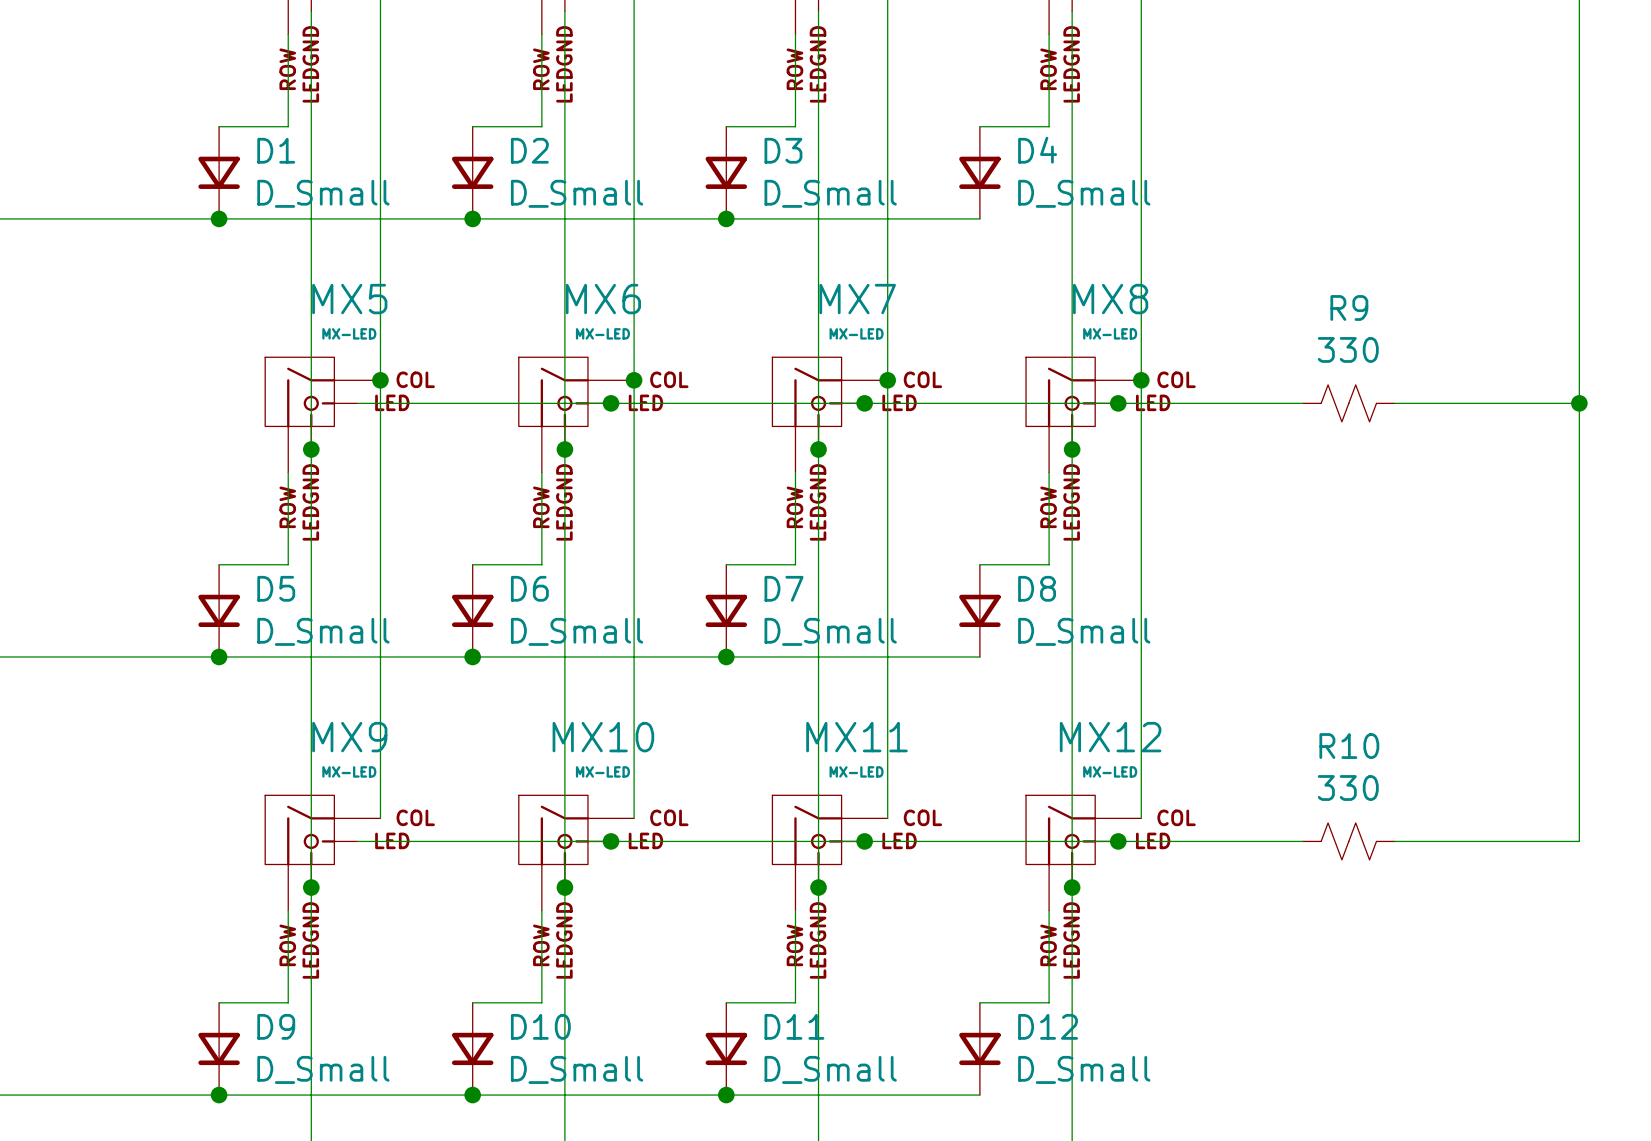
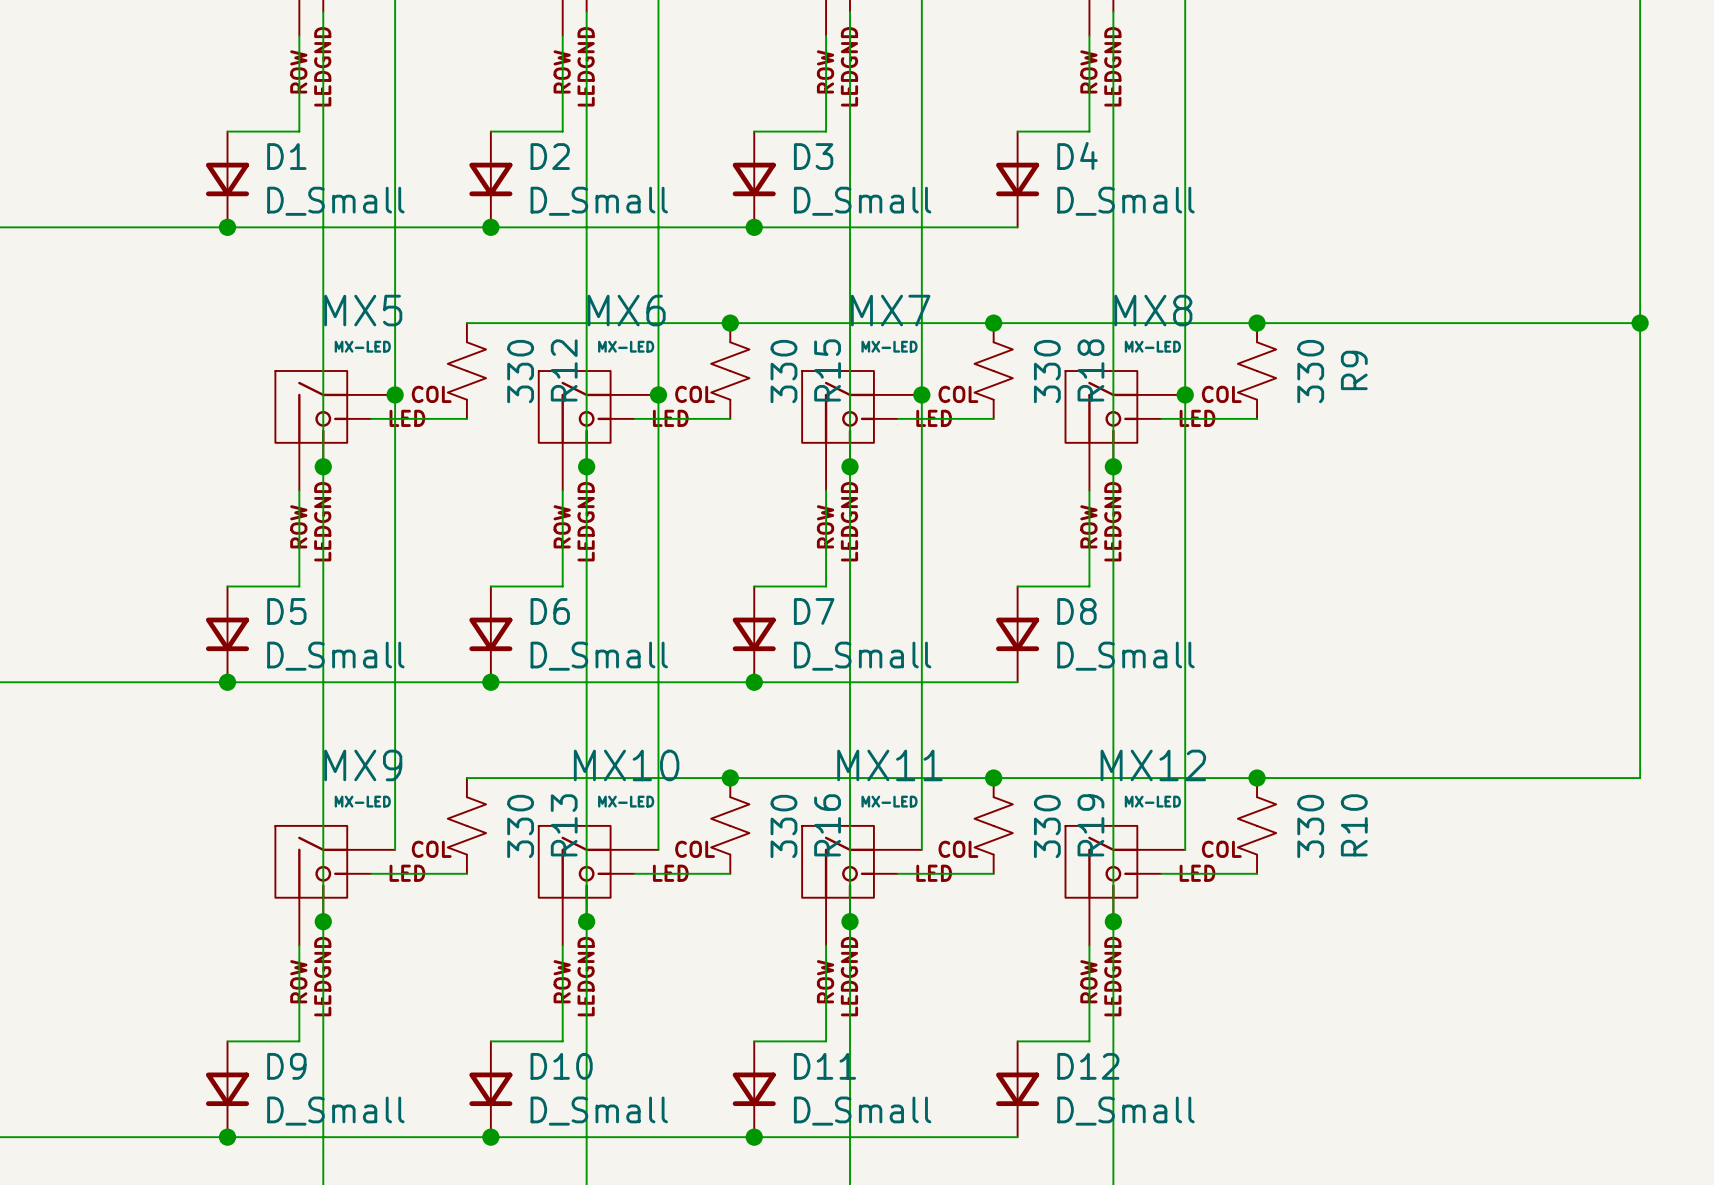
wire: none -> (466, 323) (1640, 323)
junction: none -> (730, 323)
junction: none -> (993, 323)
junction: none -> (1257, 323)
R12: none -> 330 (466, 371)
R15: none -> 330 (730, 371)
R18: none -> 330 (993, 371)
wire: (449, 403) (611, 403) -> none
junction: (611, 403) -> none
wire: (703, 403) (864, 403) -> none
junction: (864, 403) -> none
wire: (956, 403) (1118, 403) -> none
junction: (1118, 403) -> none
wire: (1210, 403) (1302, 403) -> none
R9 rotation: 0° (1348, 403) -> 90° clockwise (1257, 371)
R9 position: (1348, 403) -> (1257, 371)
wire: (1394, 403) (1579, 403) -> none
junction position: (1579, 403) -> (1640, 323)
junction: none -> (730, 778)
junction: none -> (993, 778)
junction: none -> (1257, 778)
wire: (1579, 749) (1579, 841) (1394, 841) -> (1640, 778) (466, 778)
R13: none -> 330 (466, 825)
R16: none -> 330 (730, 825)
R19: none -> 330 (993, 825)
wire: (449, 841) (611, 841) -> none
junction: (611, 841) -> none
wire: (703, 841) (864, 841) -> none
junction: (864, 841) -> none
wire: (956, 841) (1118, 841) -> none
junction: (1118, 841) -> none
wire: (1210, 841) (1302, 841) -> none
R10 rotation: 0° (1348, 841) -> 90° clockwise (1257, 825)
R10 position: (1348, 841) -> (1257, 825)

